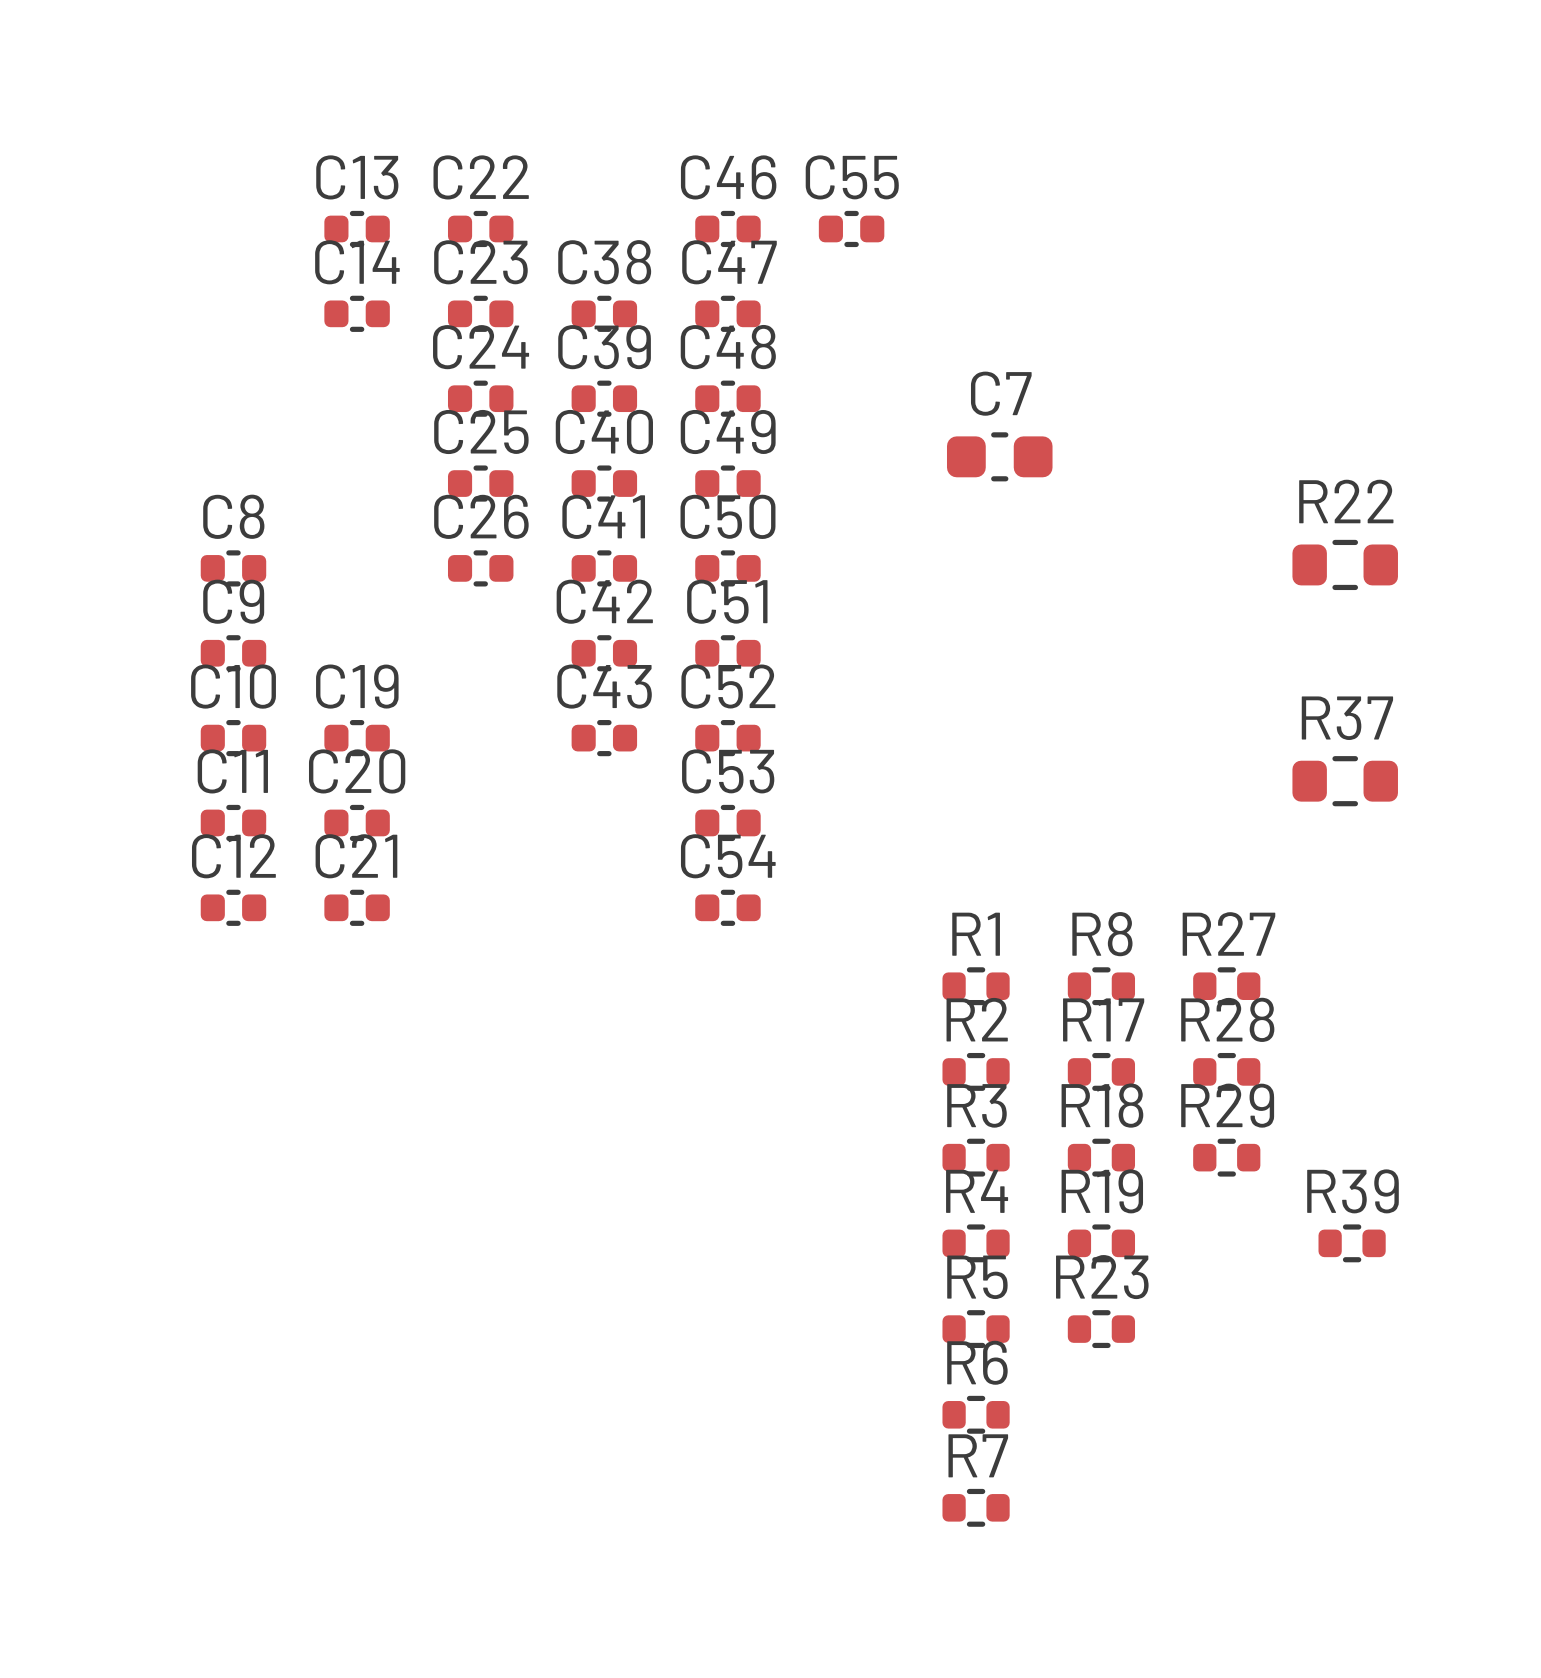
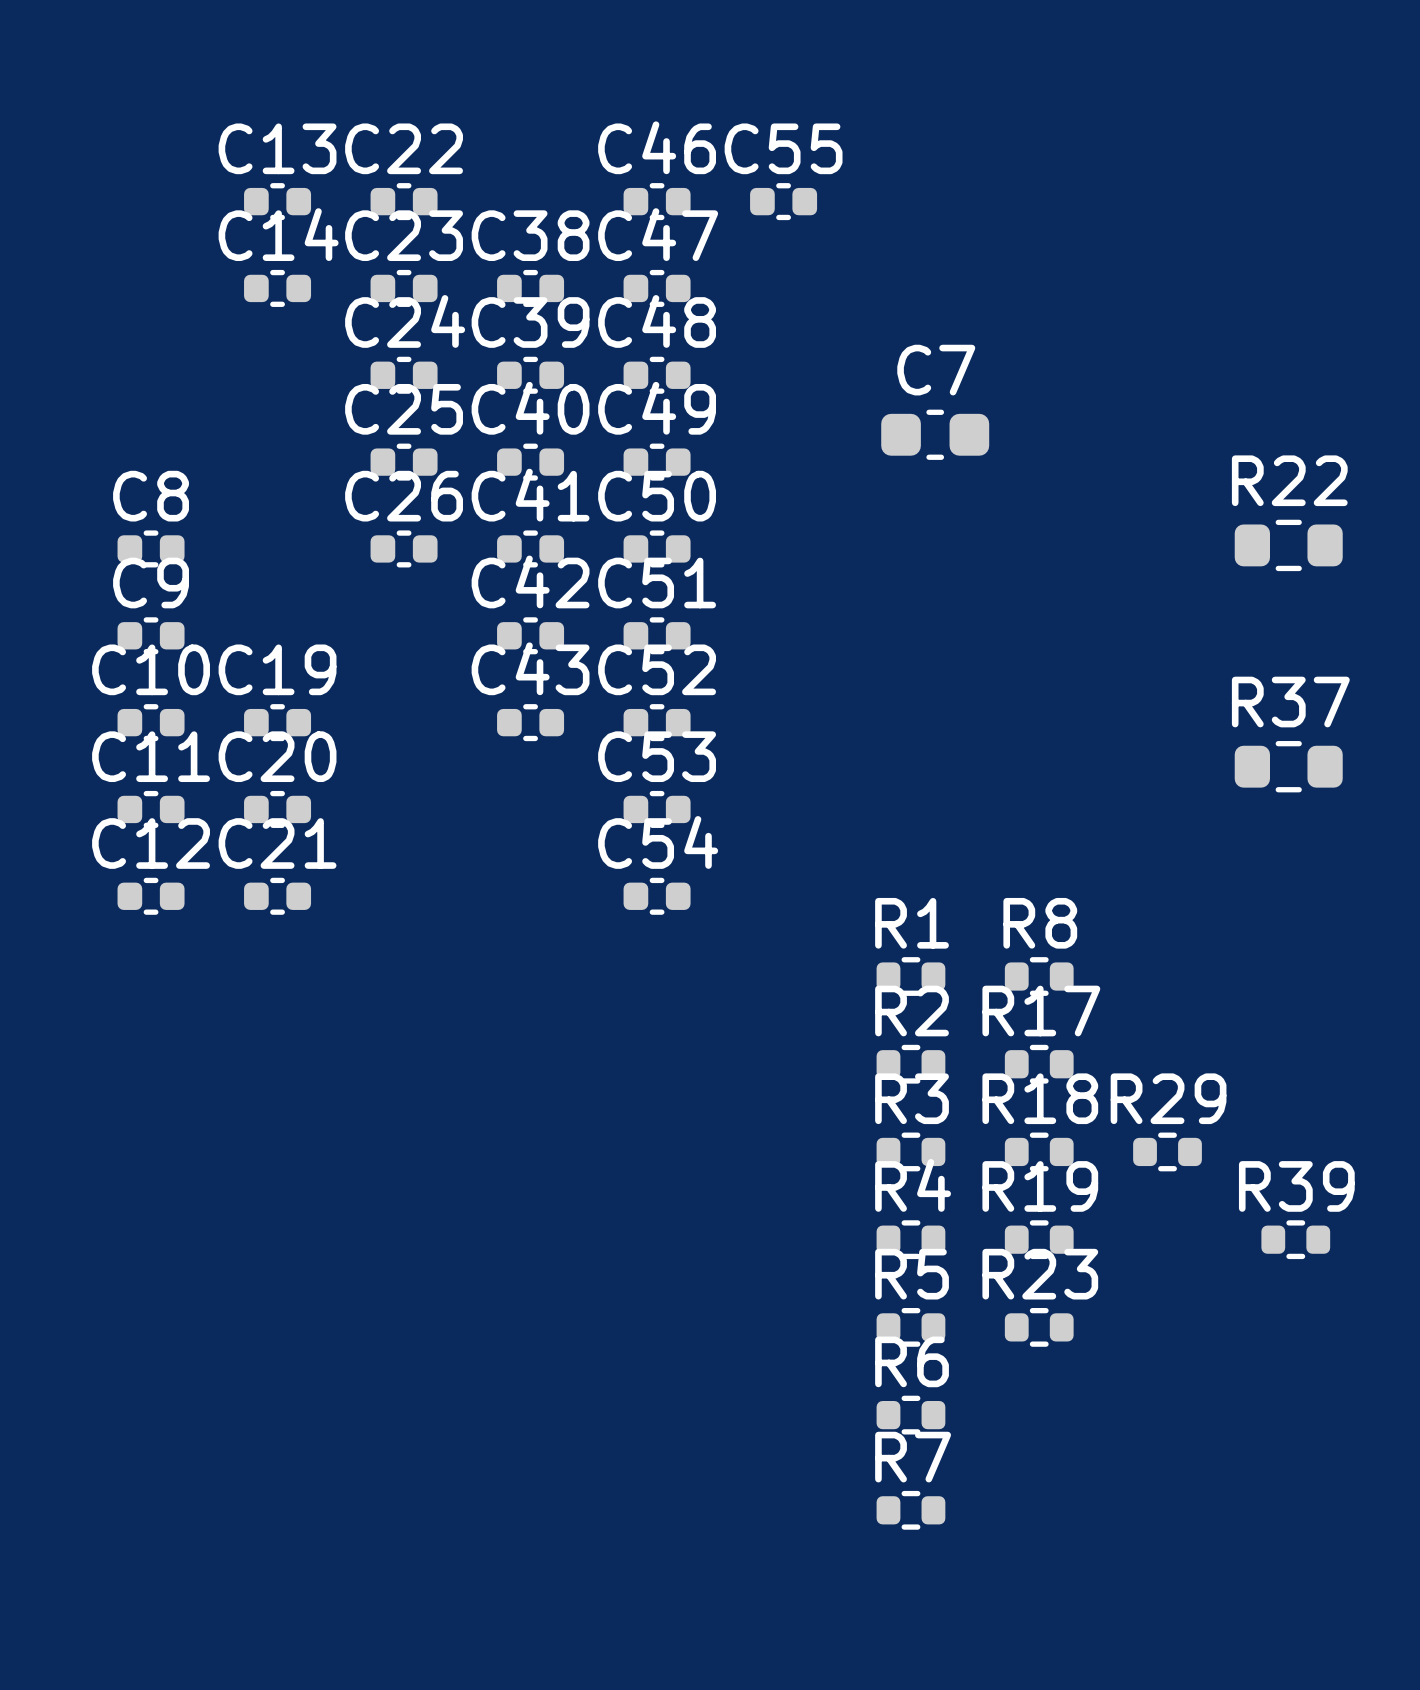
R27: (1226, 986) -> none
R28: (1226, 1071) -> none

